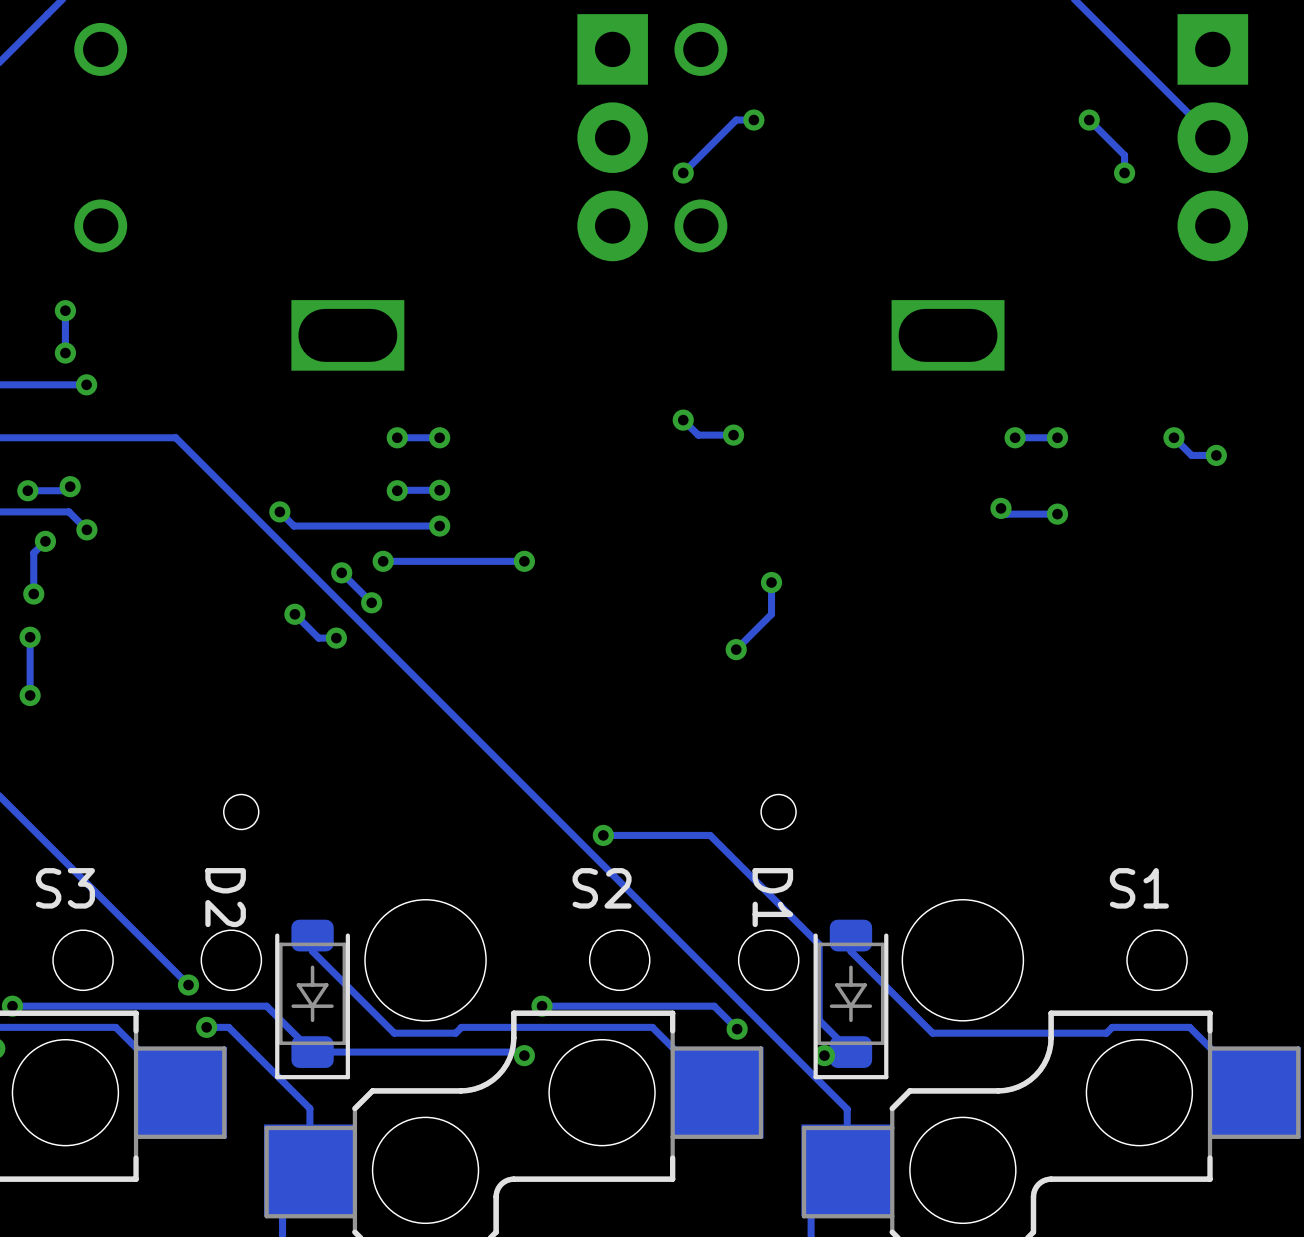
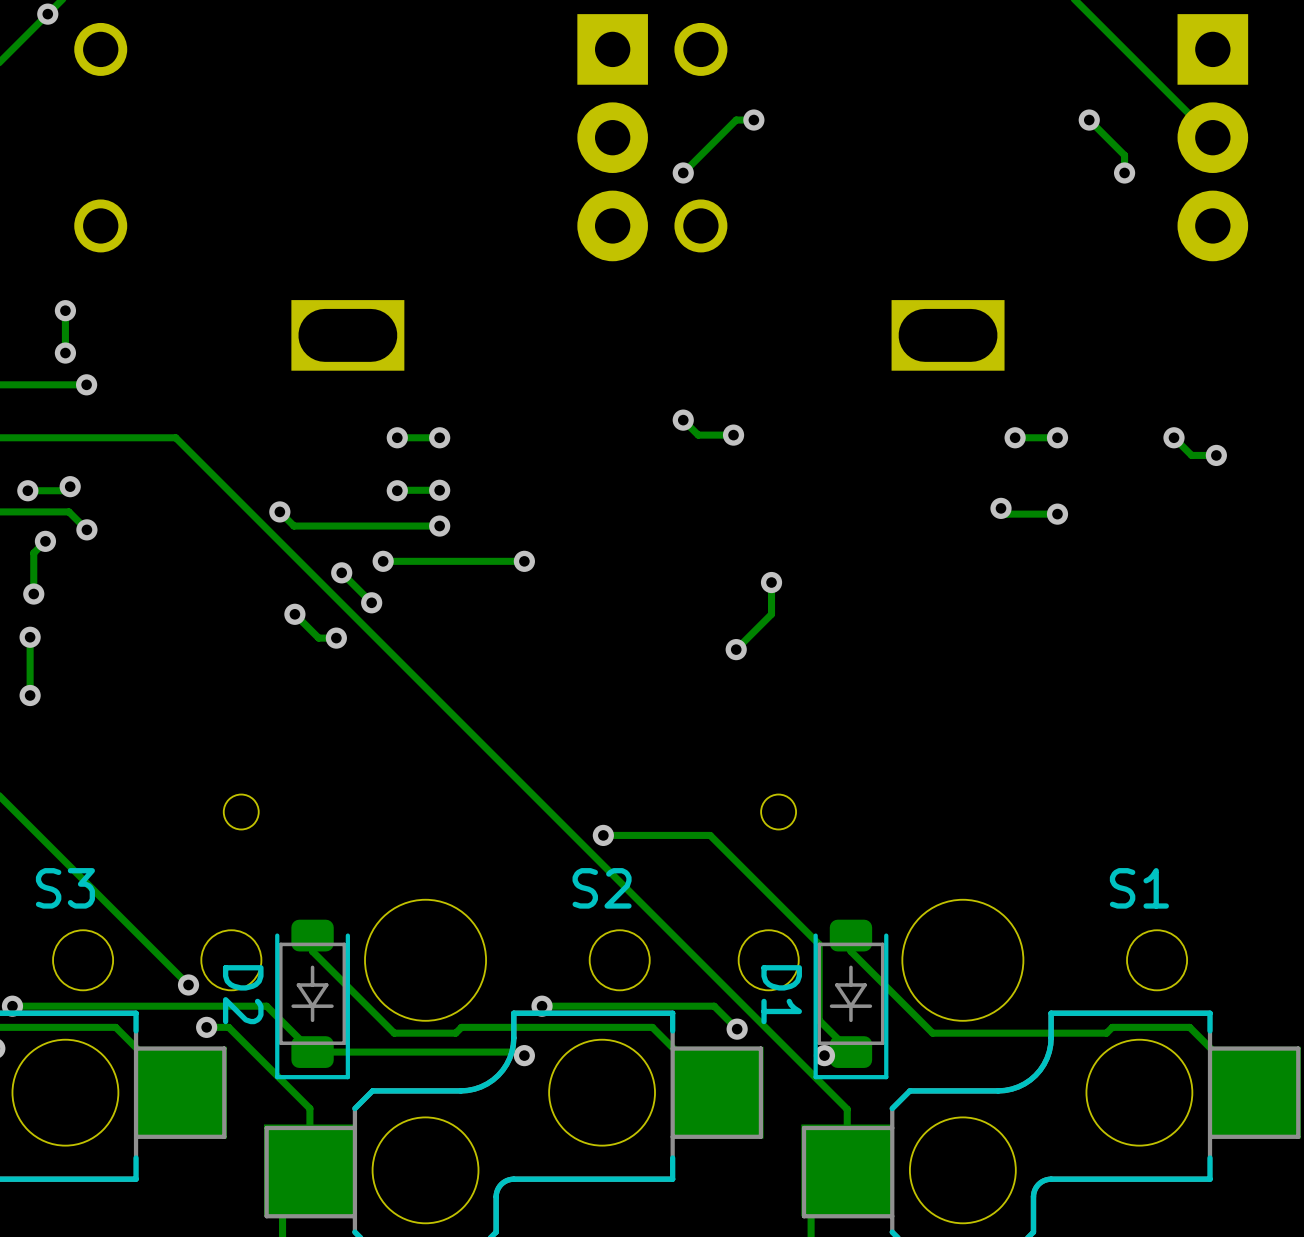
via: none -> (47, 14)
D2 name position: D2 (225, 897) -> D2 (243, 994)
D1 name position: D1 (772, 897) -> D1 (781, 994)

